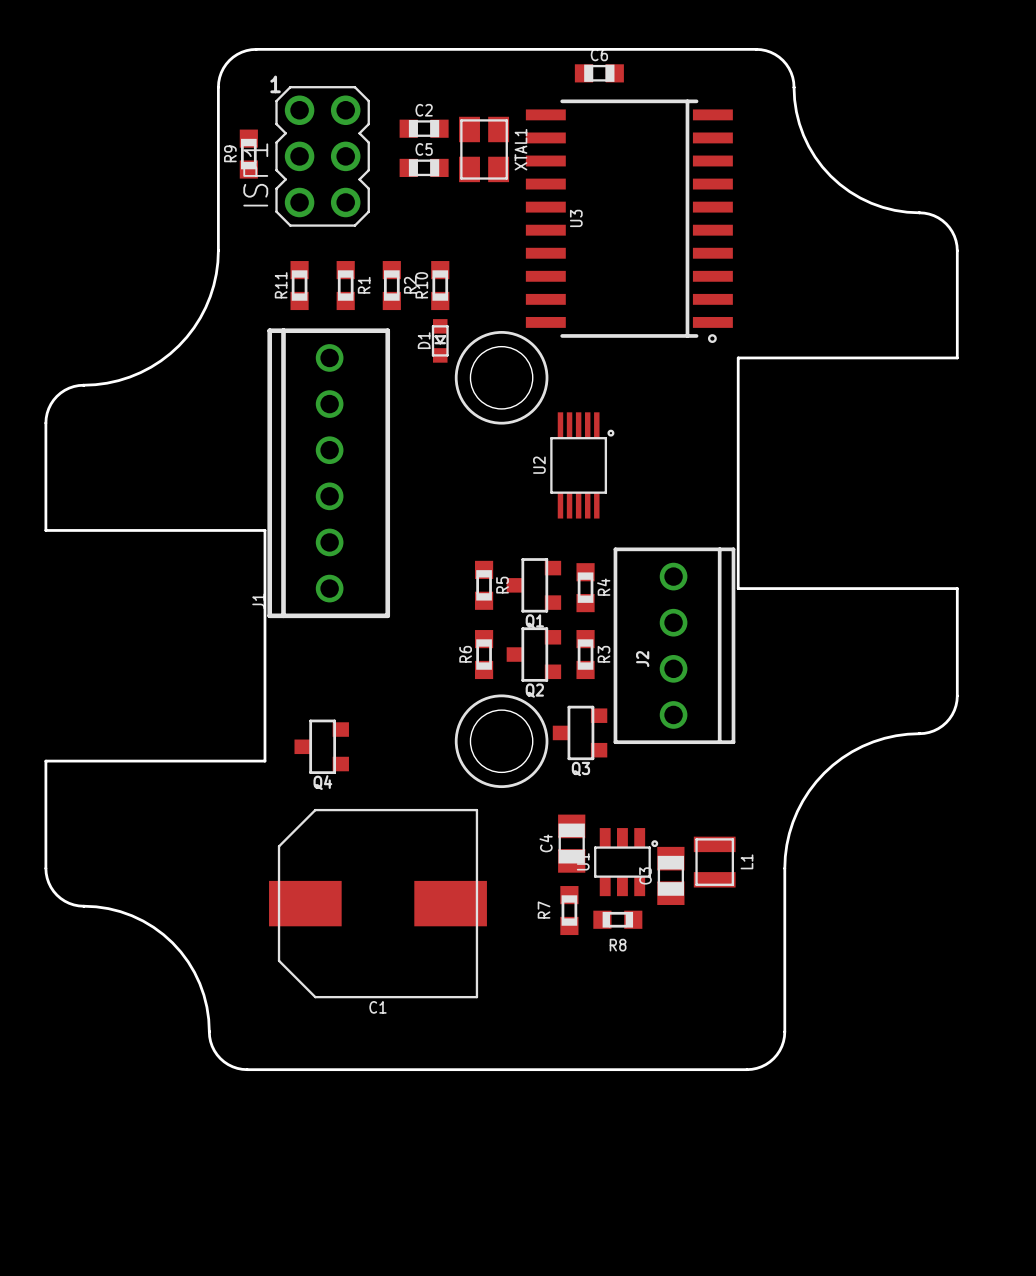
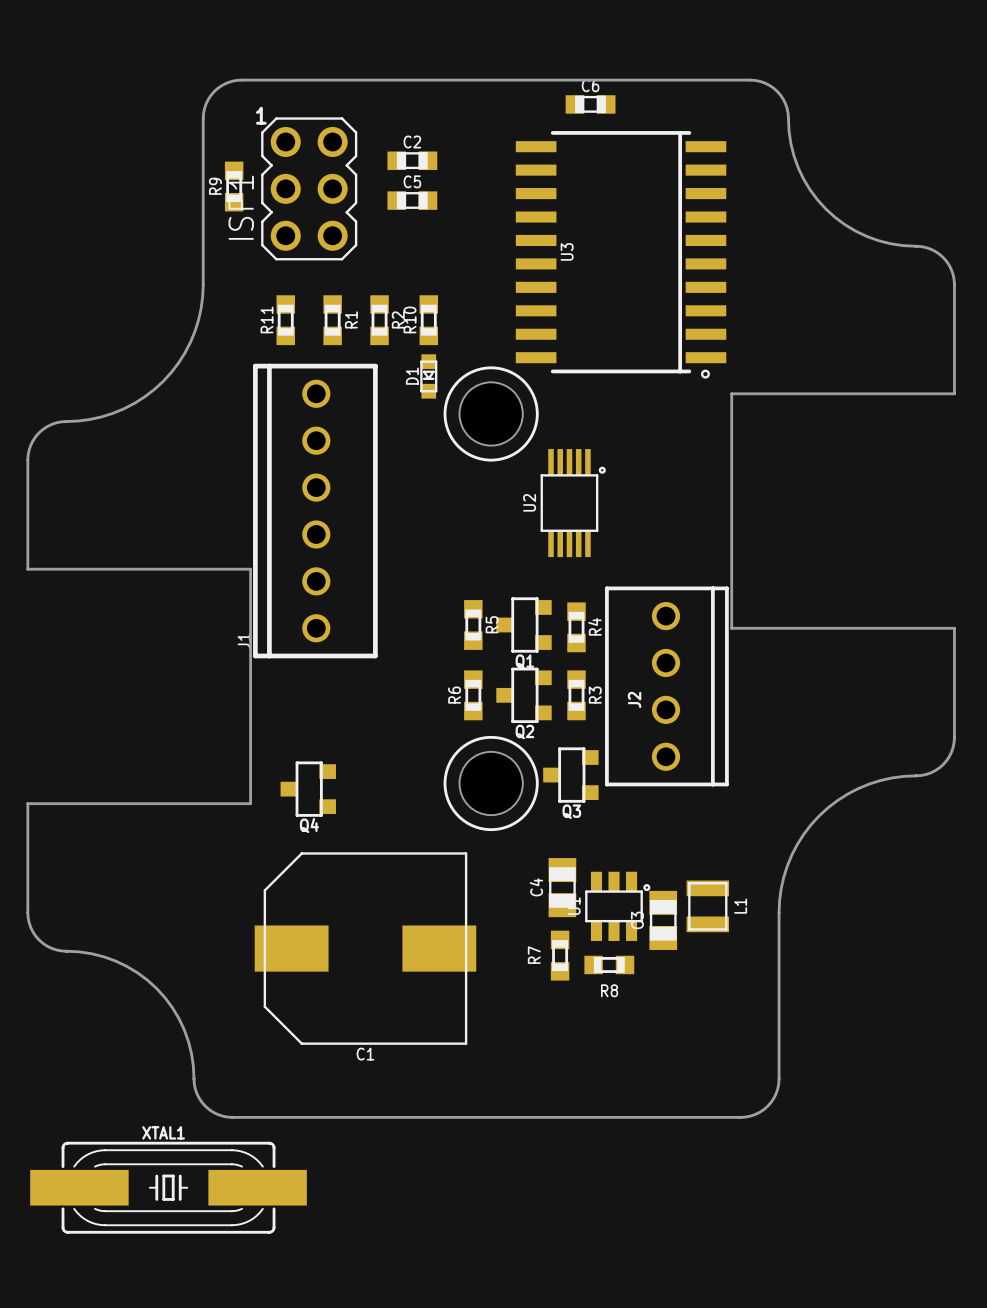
XTAL1 footprint: [459, 116, 510, 183] -> [30, 1141, 307, 1234]
XTAL1 name position: XTAL1 (520, 149) -> XTAL1 (163, 1132)

